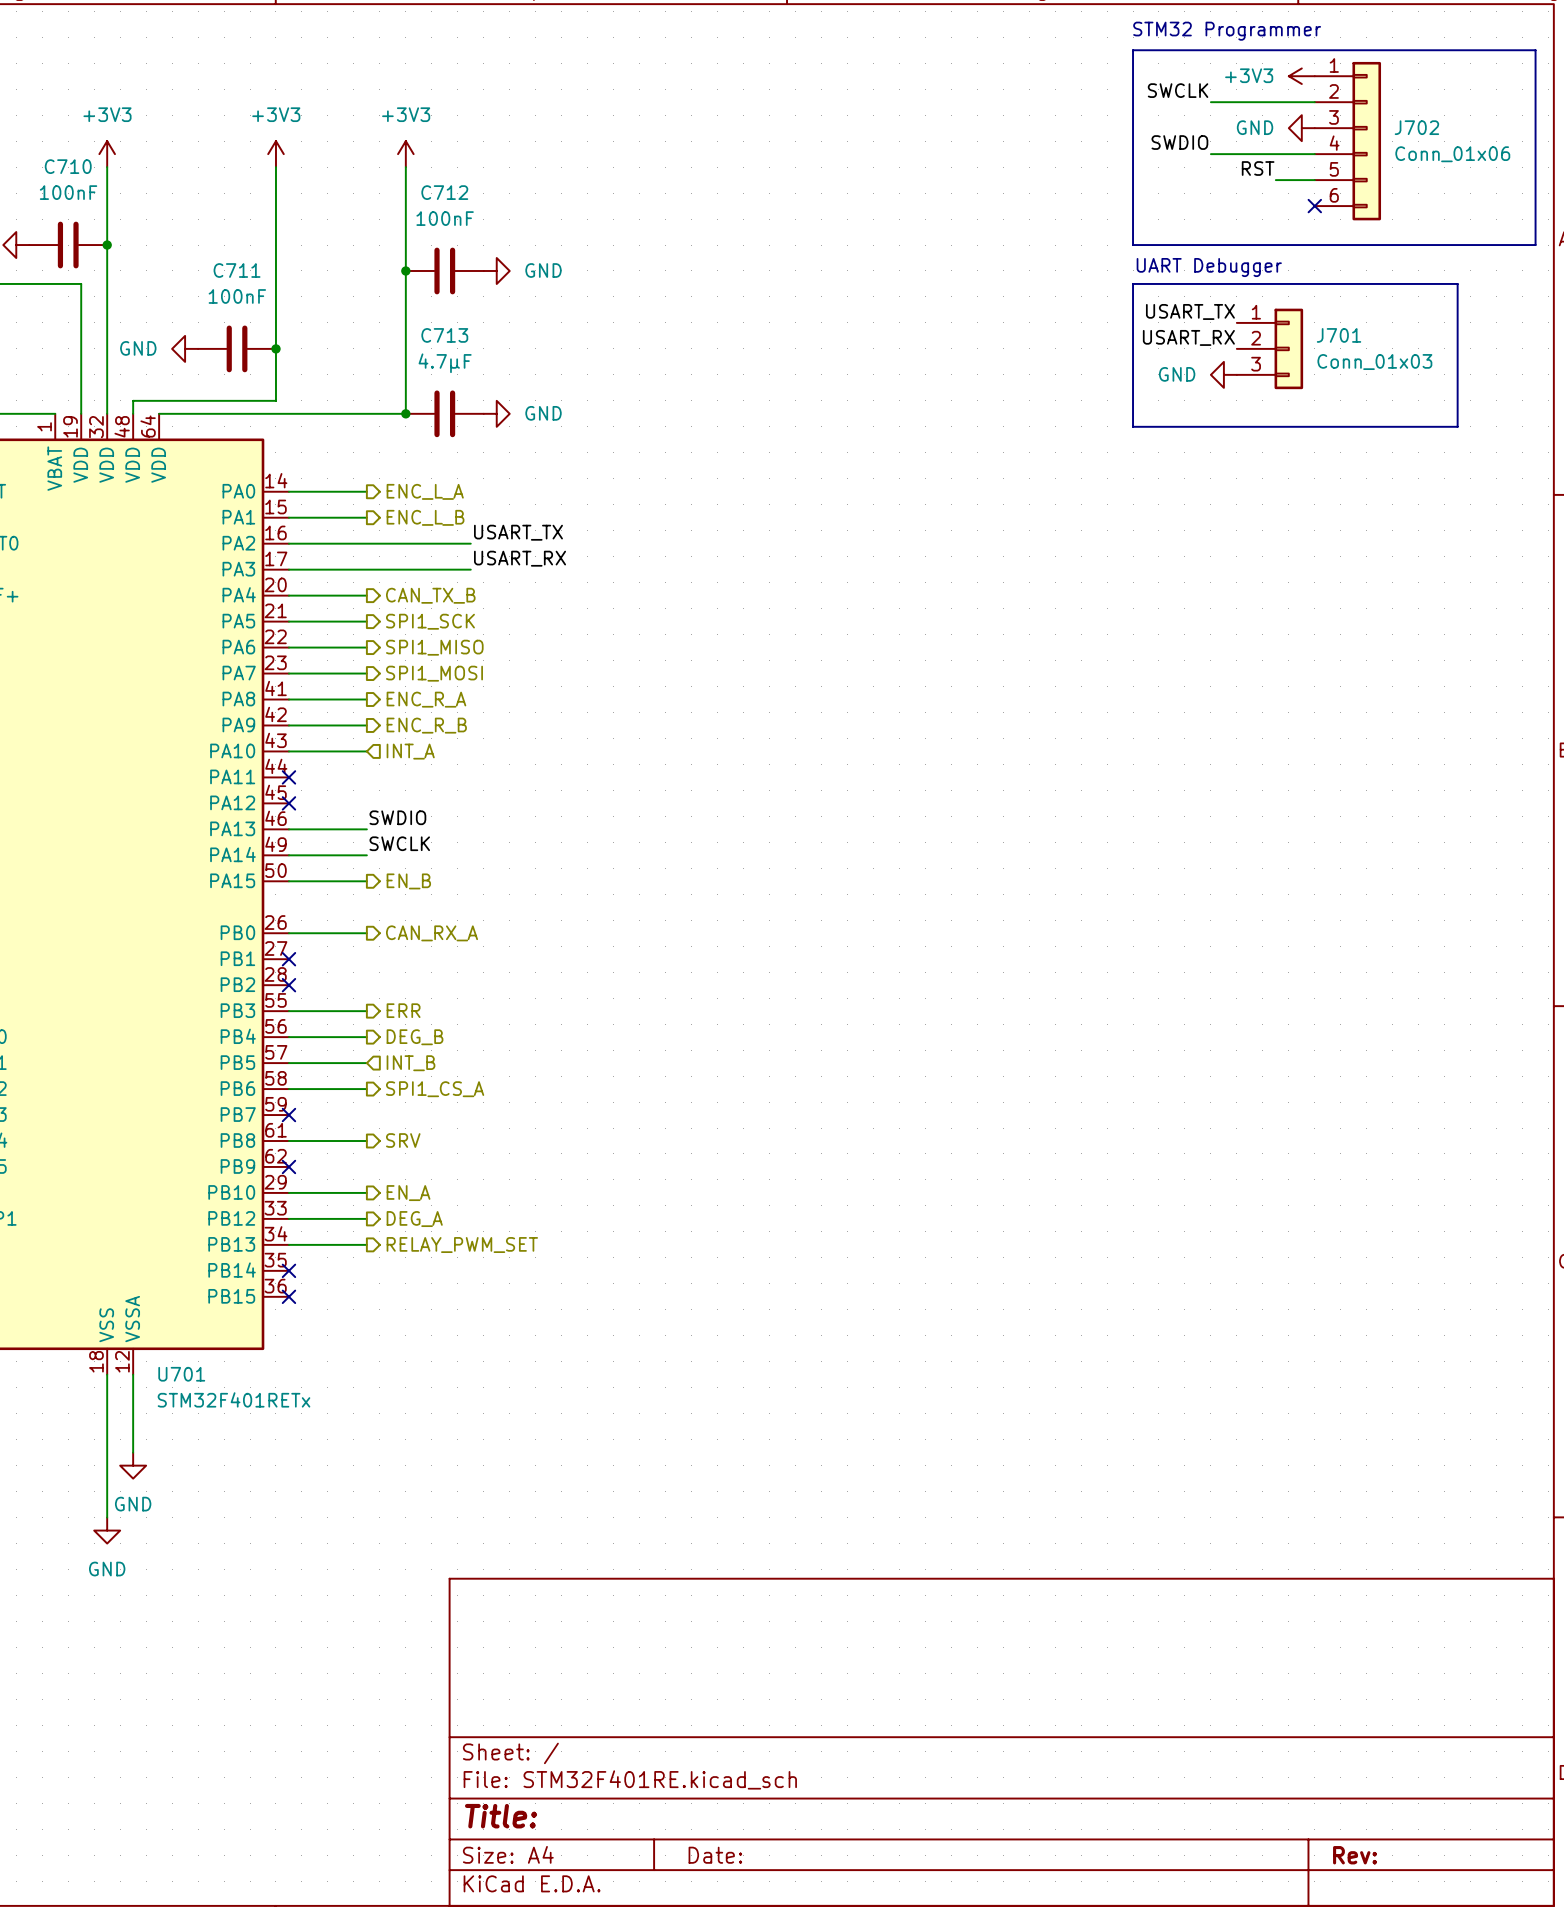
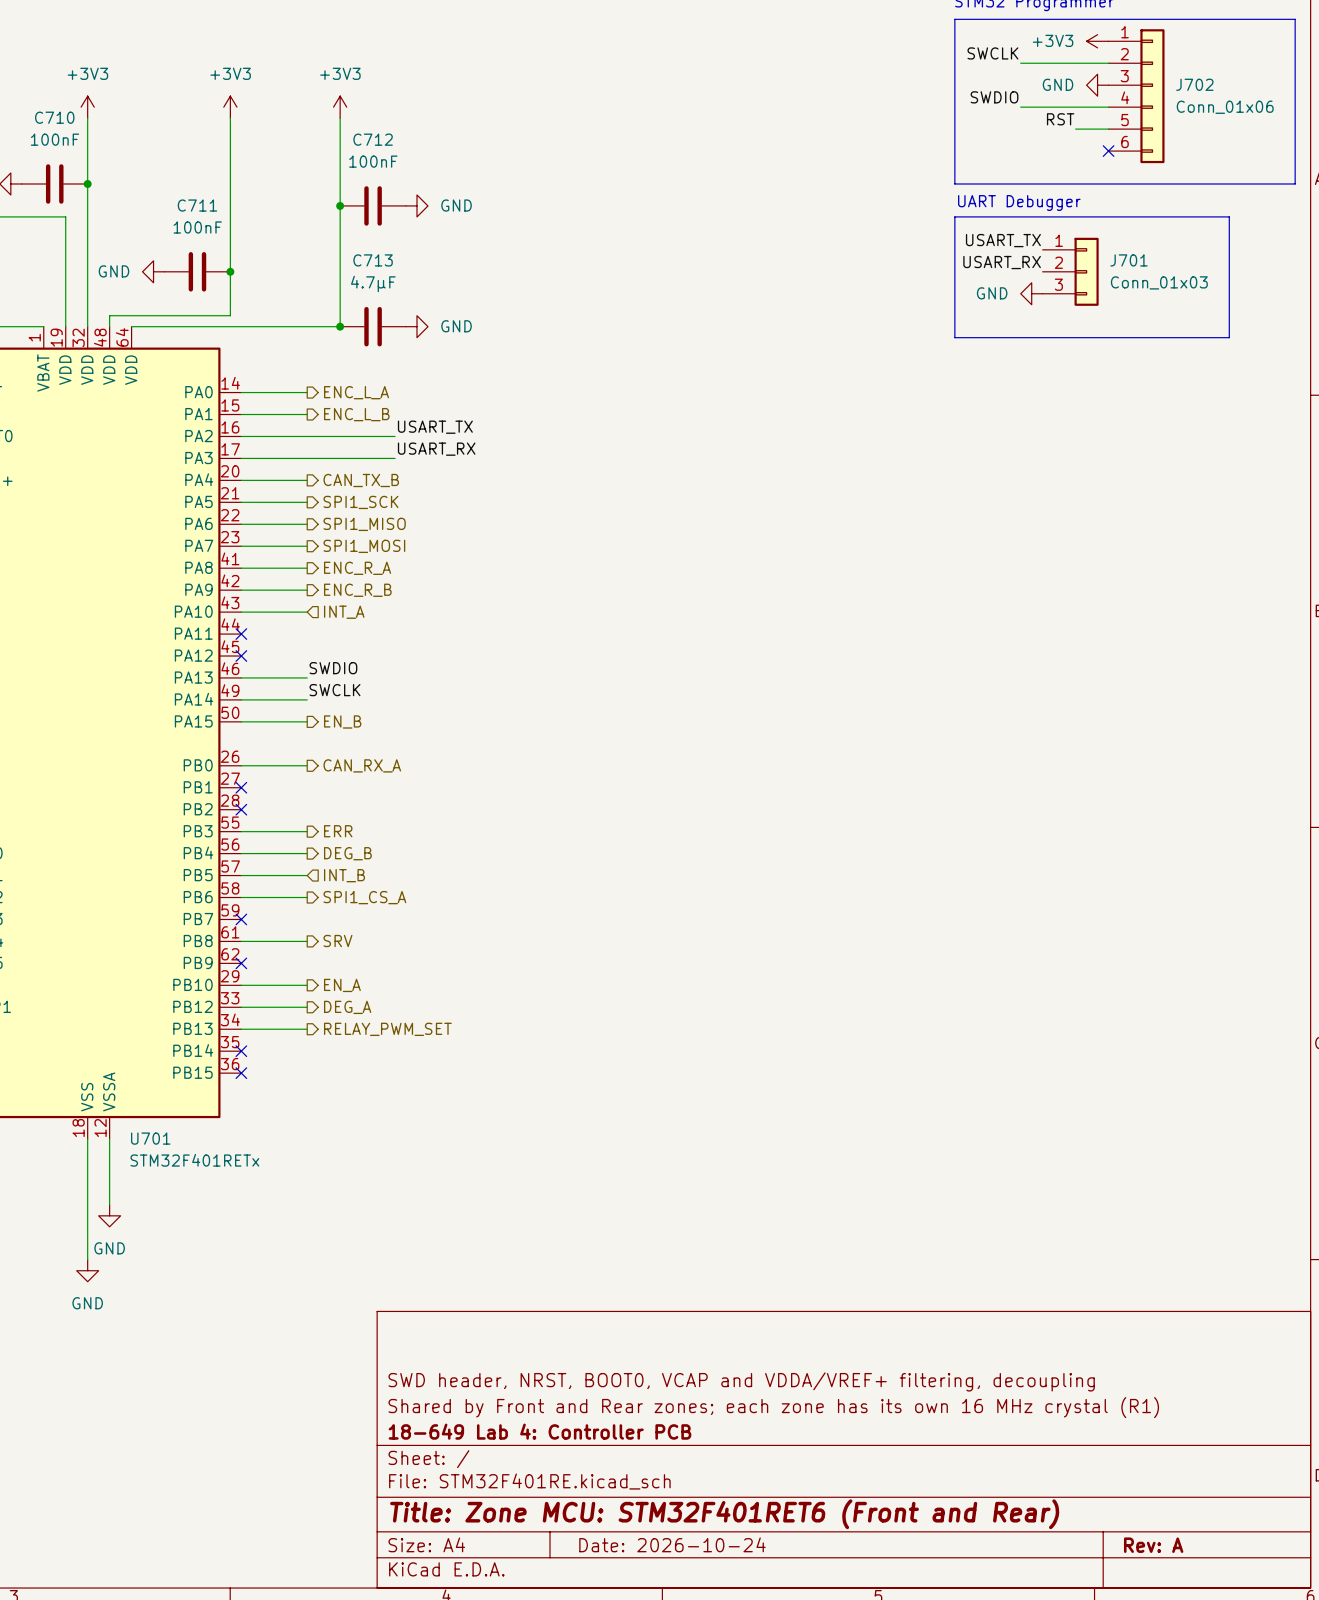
title block: none -> SWD header, NRST, BOOT0, VCAP and VDDA/VREF+ filtering, decoupling (741, 1381)
title block: none -> Shared by Front and Rear zones; each zone has its own 16 MHz crystal (R1) (773, 1407)
title block: none -> 18-649 Lab 4: Controller PCB (539, 1431)
title block: Title: (501, 1816) -> Title: Zone MCU: STM32F401RET6 (Front and Rear) (724, 1514)
title block: Date: (715, 1855) -> Date: 2026-10-24 (672, 1544)
title block: Rev: (1355, 1855) -> Rev: A (1153, 1545)

